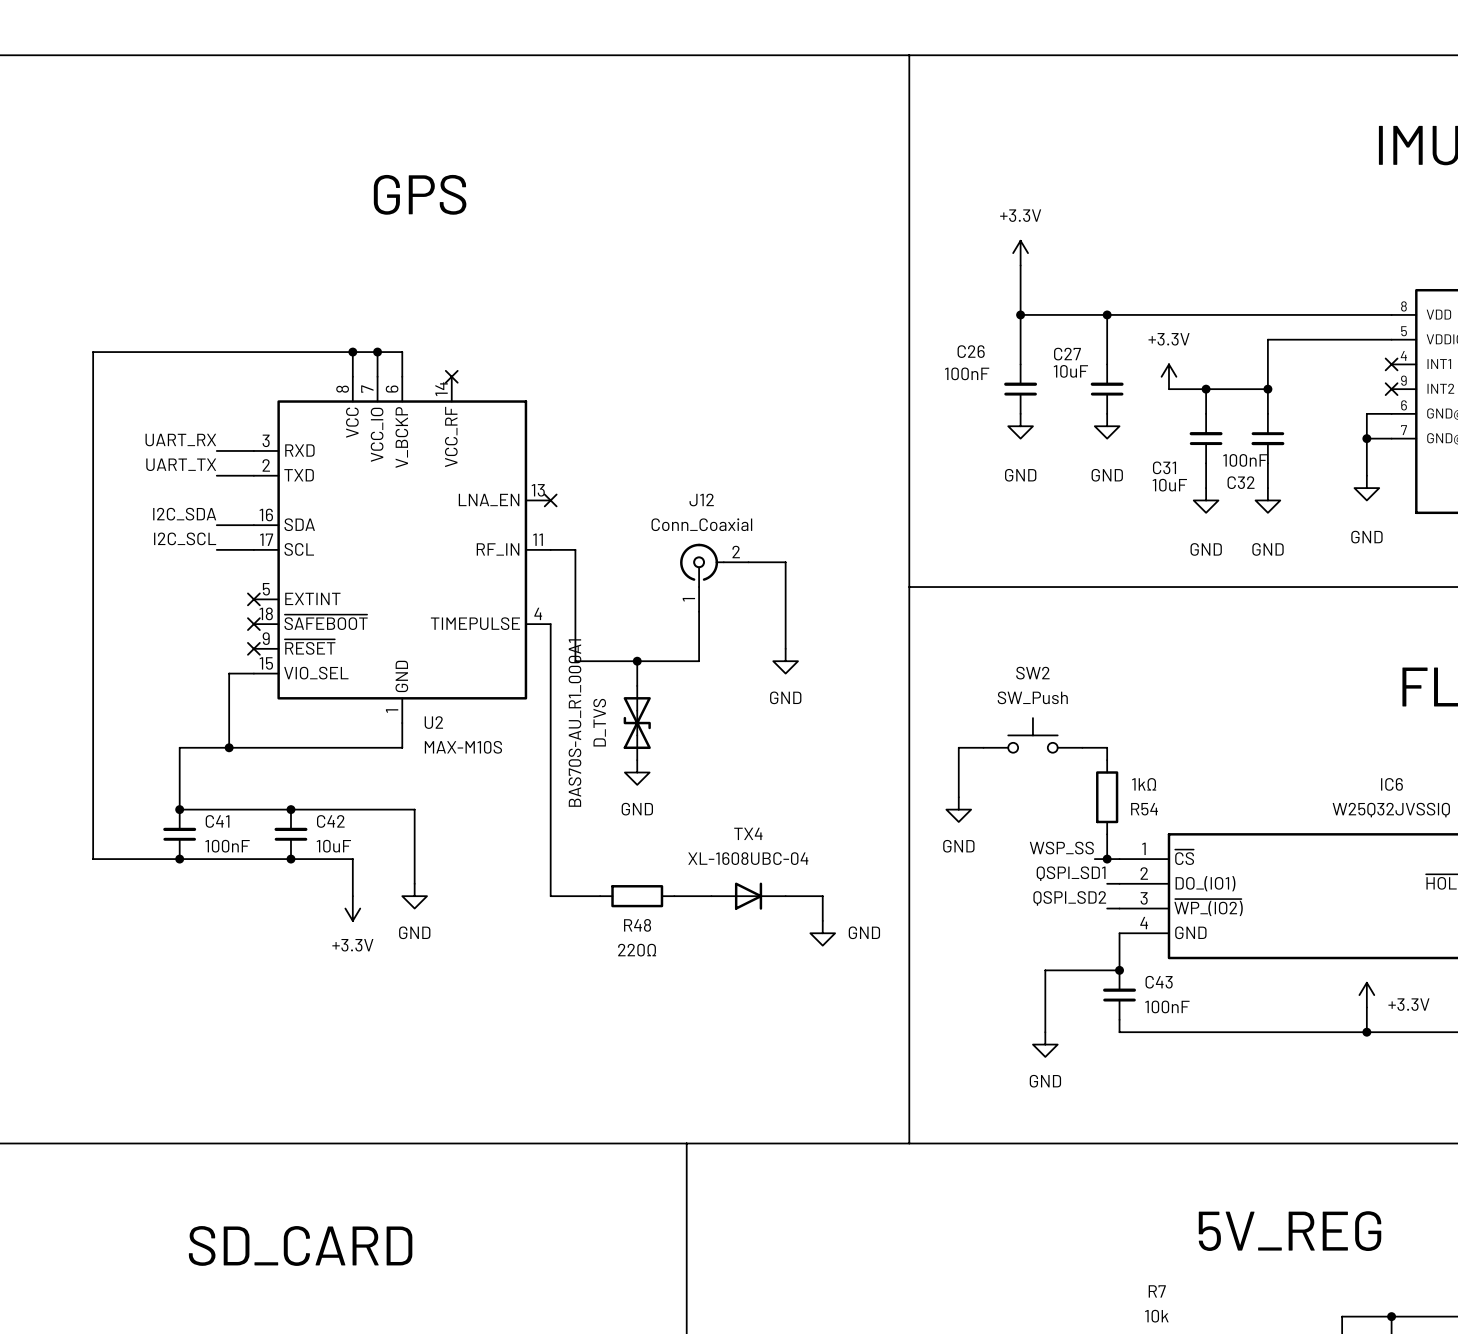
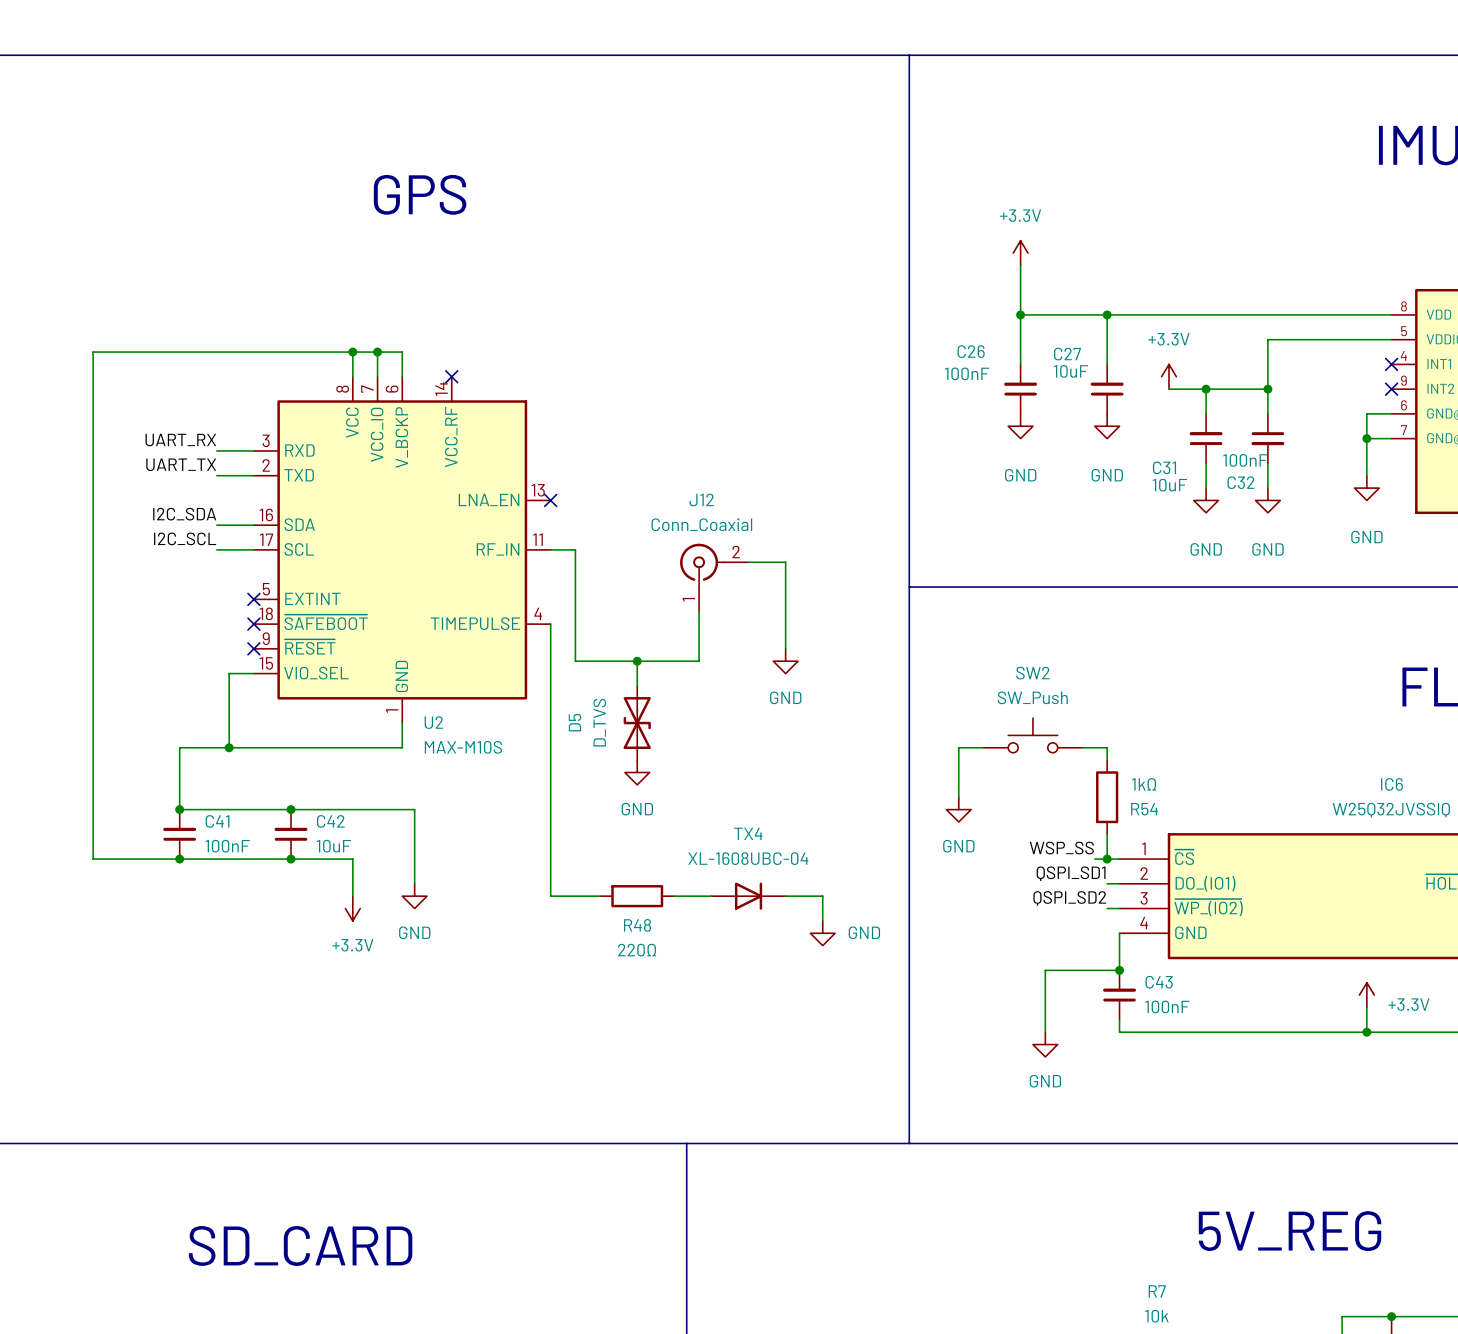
BAS70S-AU_R1_000A1 name: BAS70S-AU_R1_000A1 (574, 723) -> D5 (575, 722)

